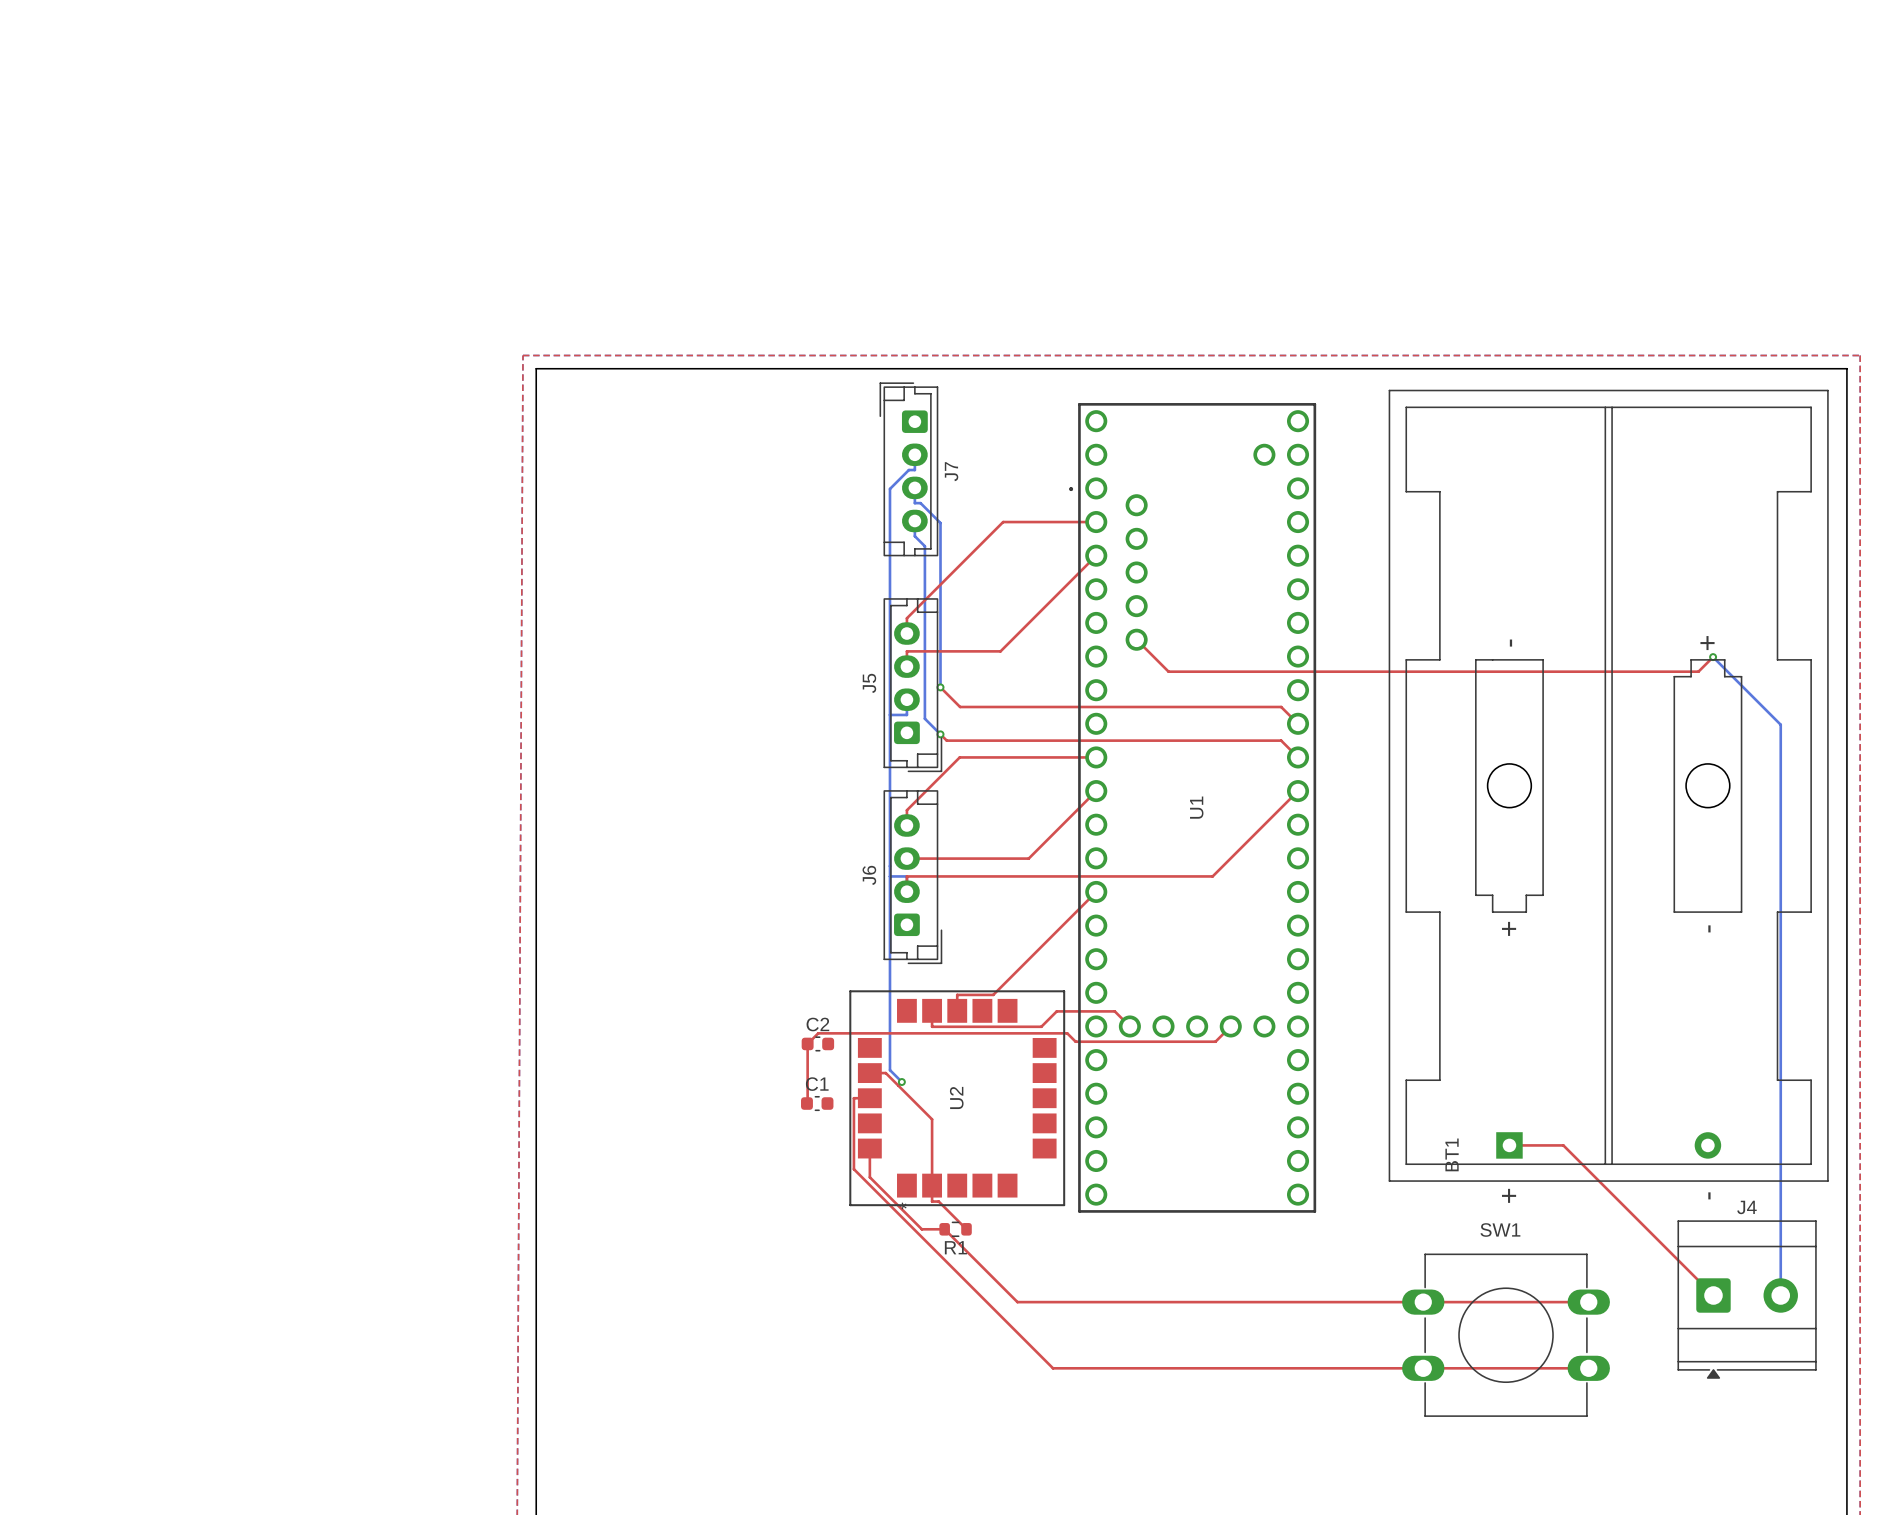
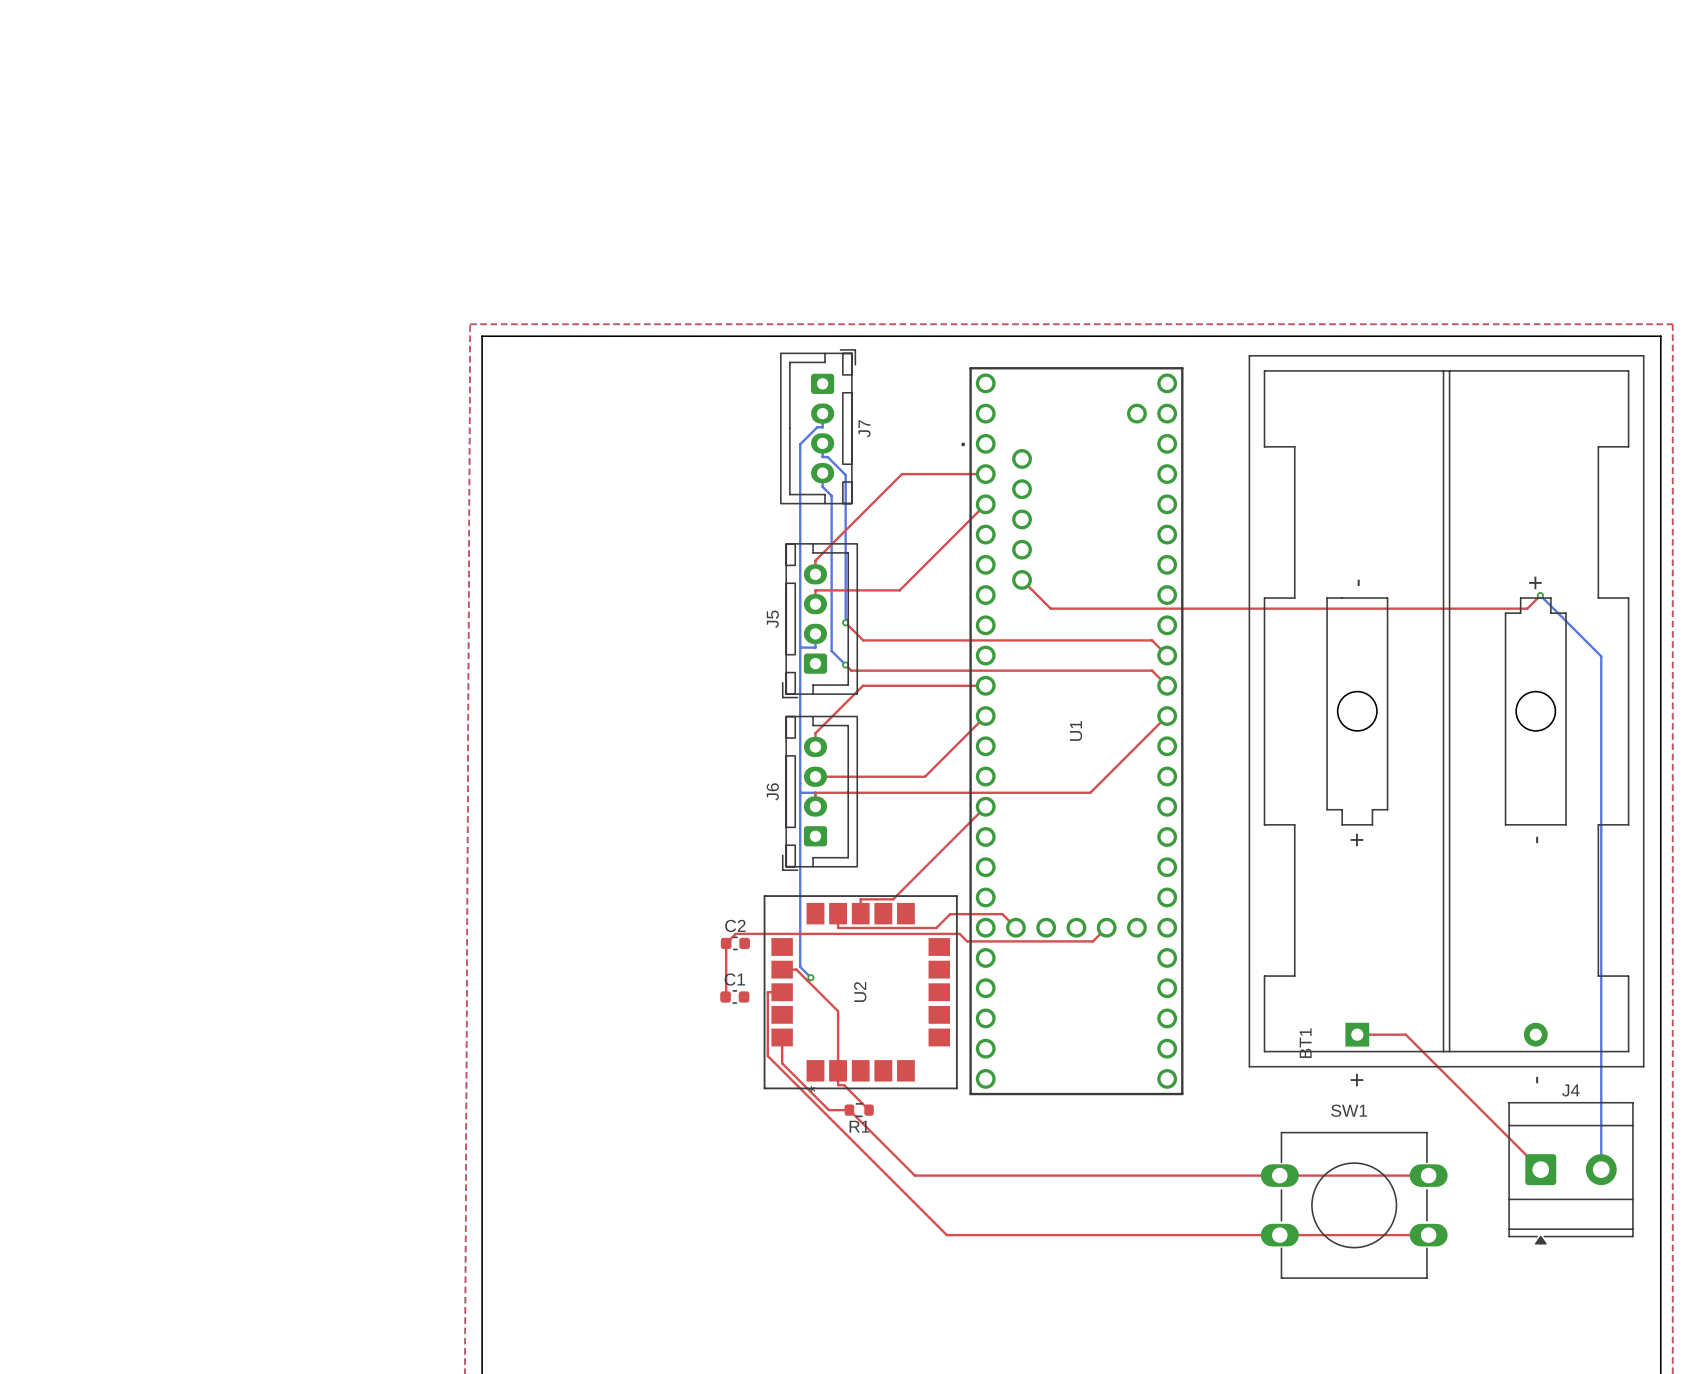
J7 footprint: [879, 382, 939, 557] -> [780, 349, 857, 505]
J5 footprint: [883, 598, 943, 773] -> [782, 543, 858, 699]
J6 footprint: [883, 790, 943, 965] -> [782, 715, 858, 871]

